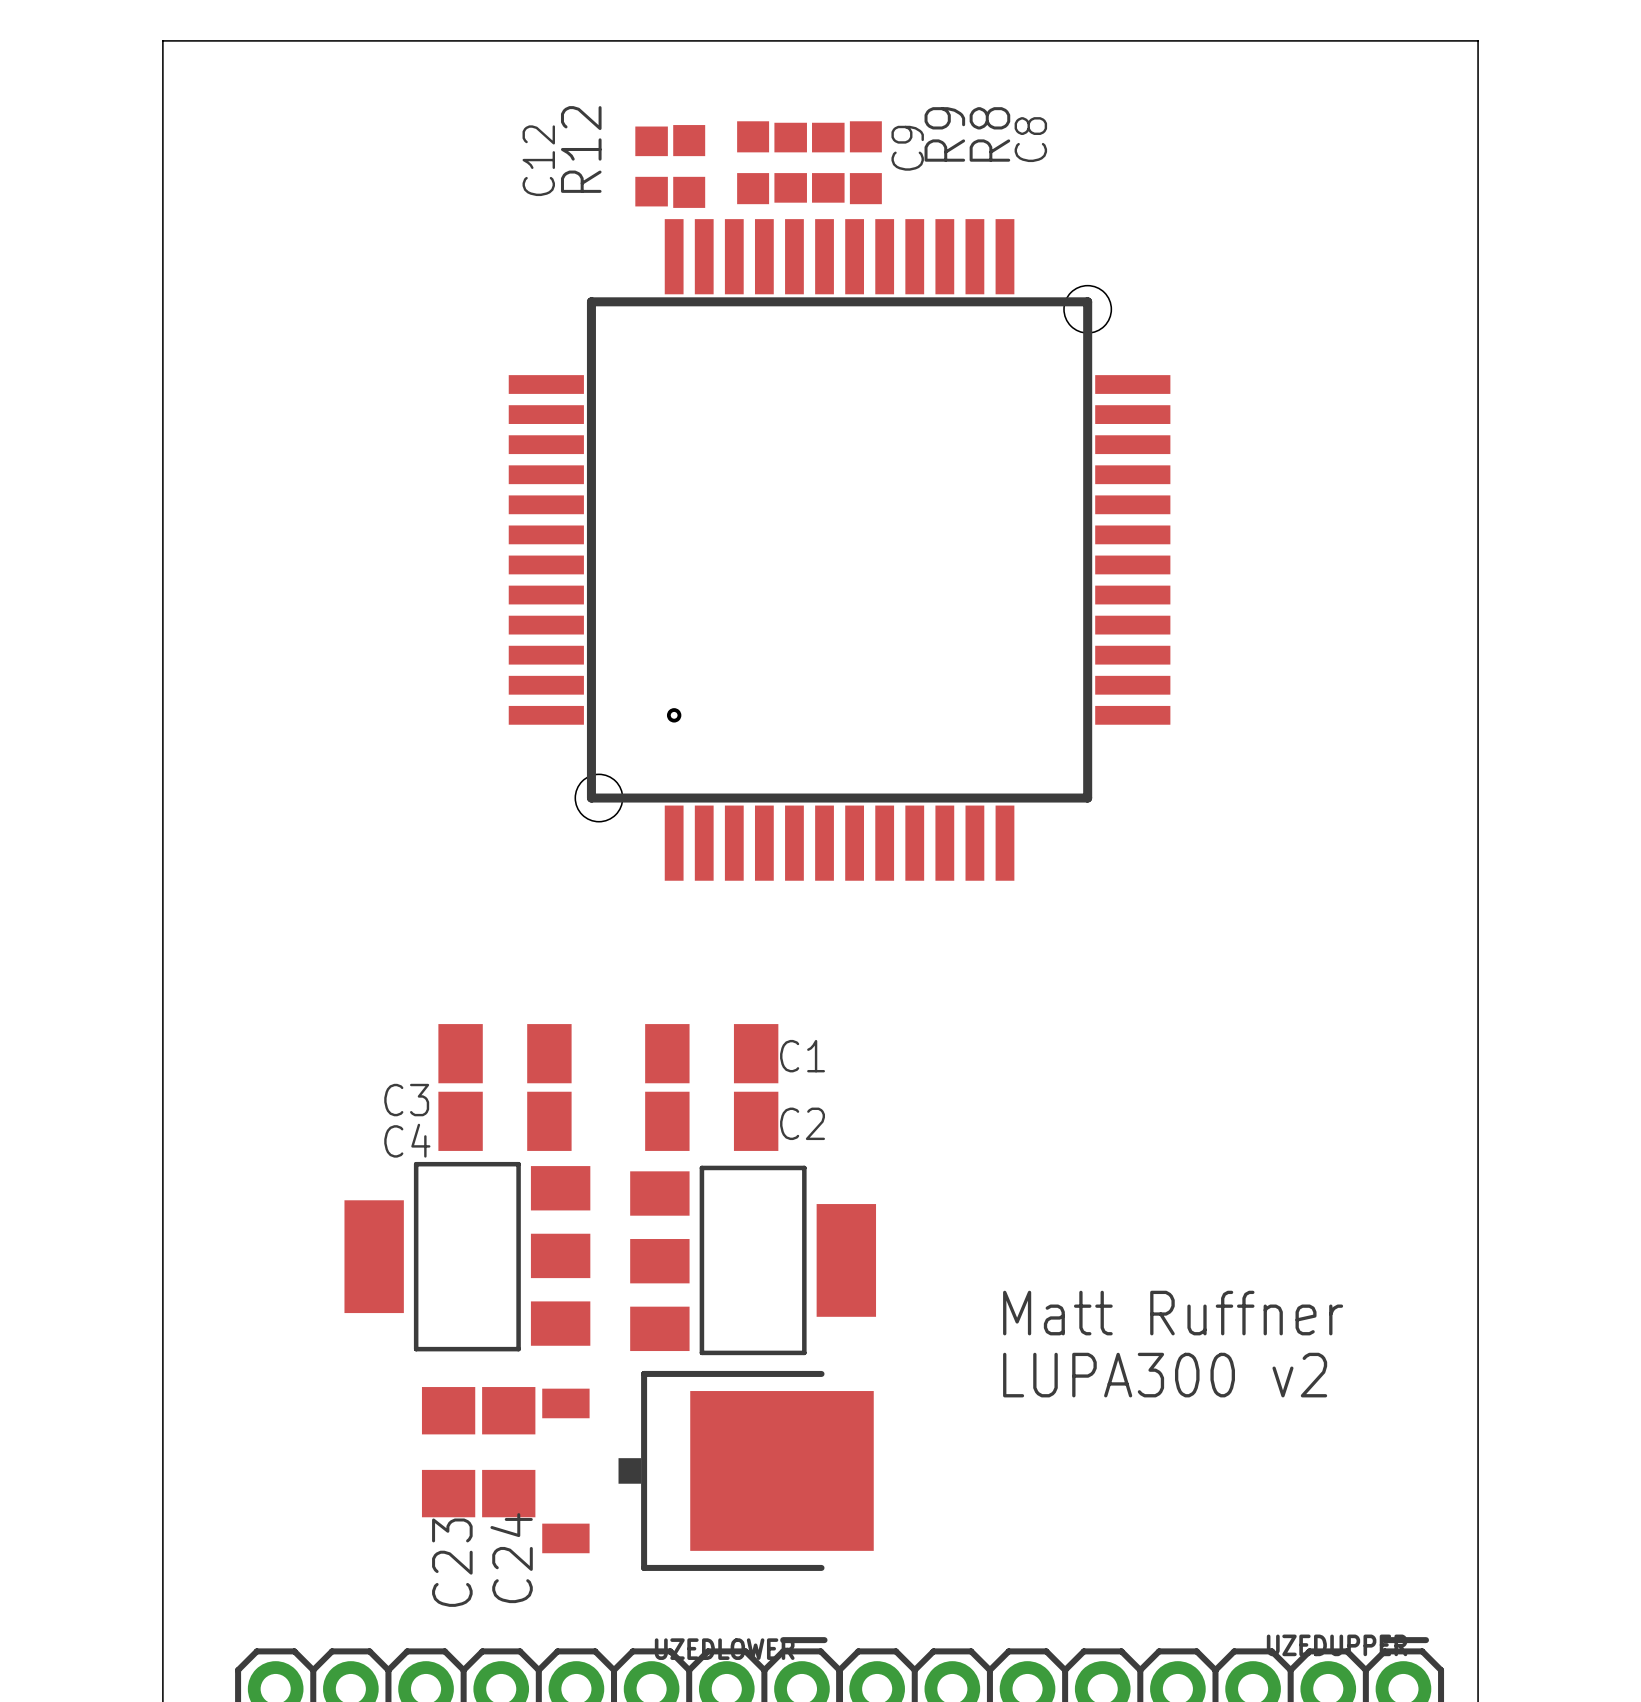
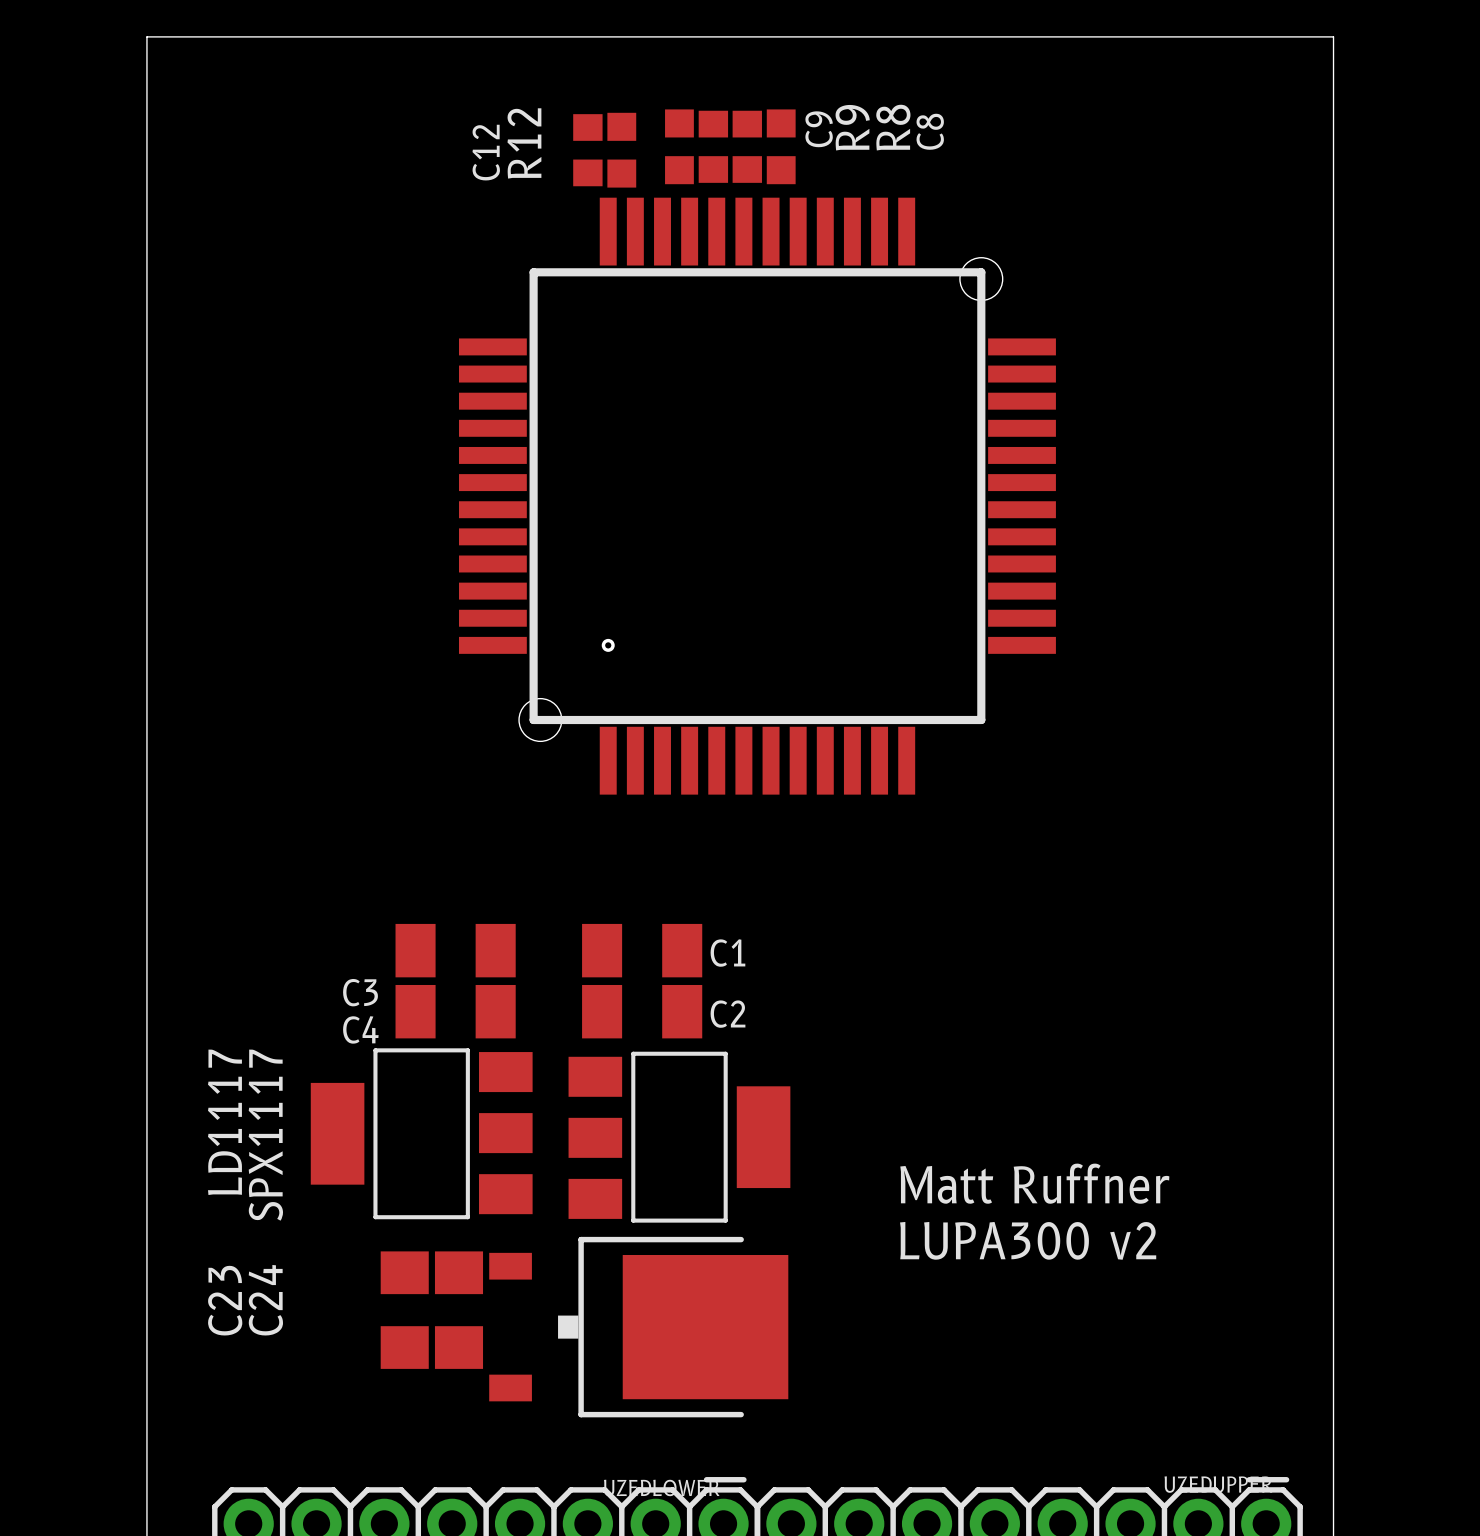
part value: none -> LD1117 (224, 1122)
part value: none -> SPX1117 (265, 1135)
C24 name position: C24 (511, 1558) -> C24 (265, 1300)
C23 name position: C23 (452, 1562) -> C23 (225, 1300)

